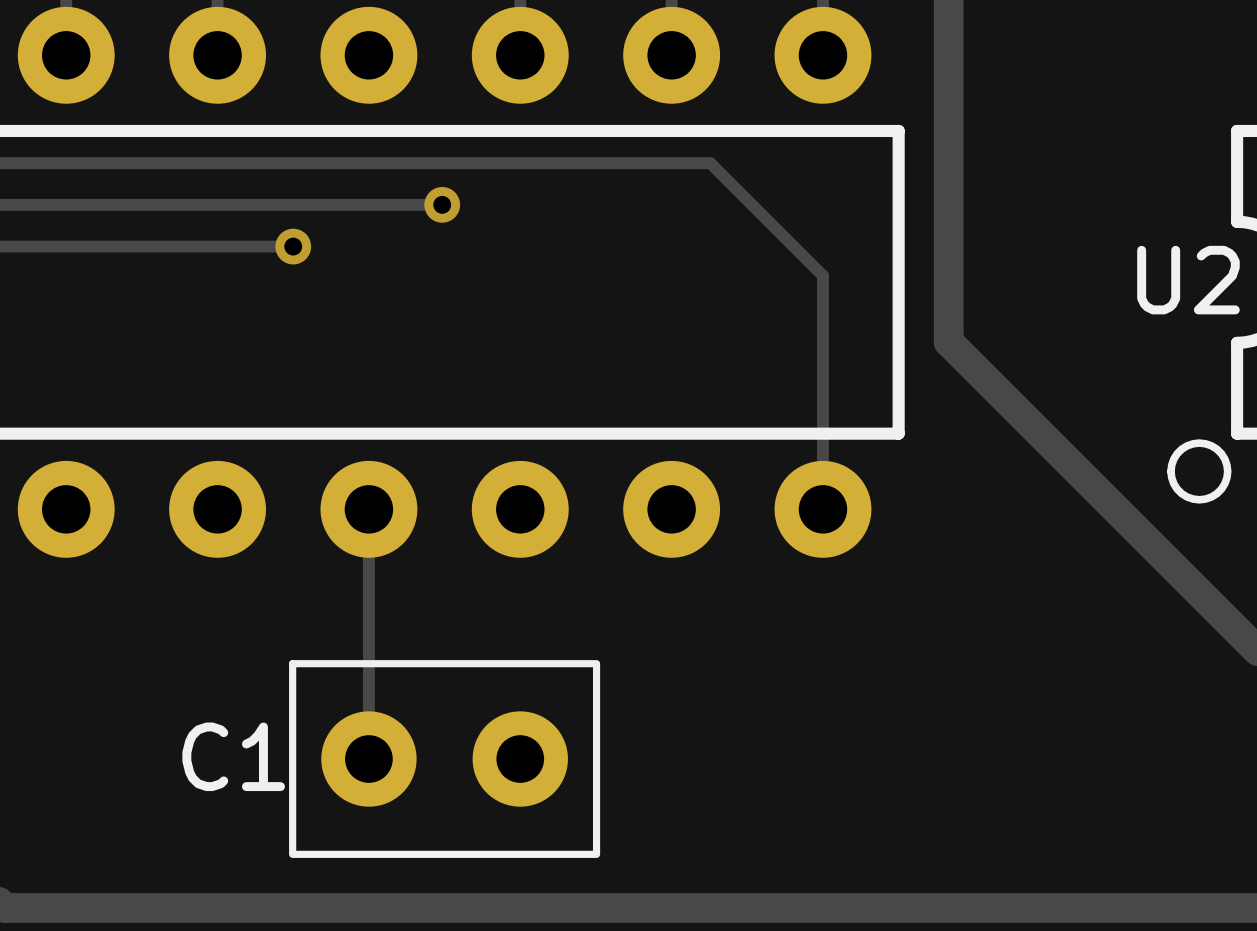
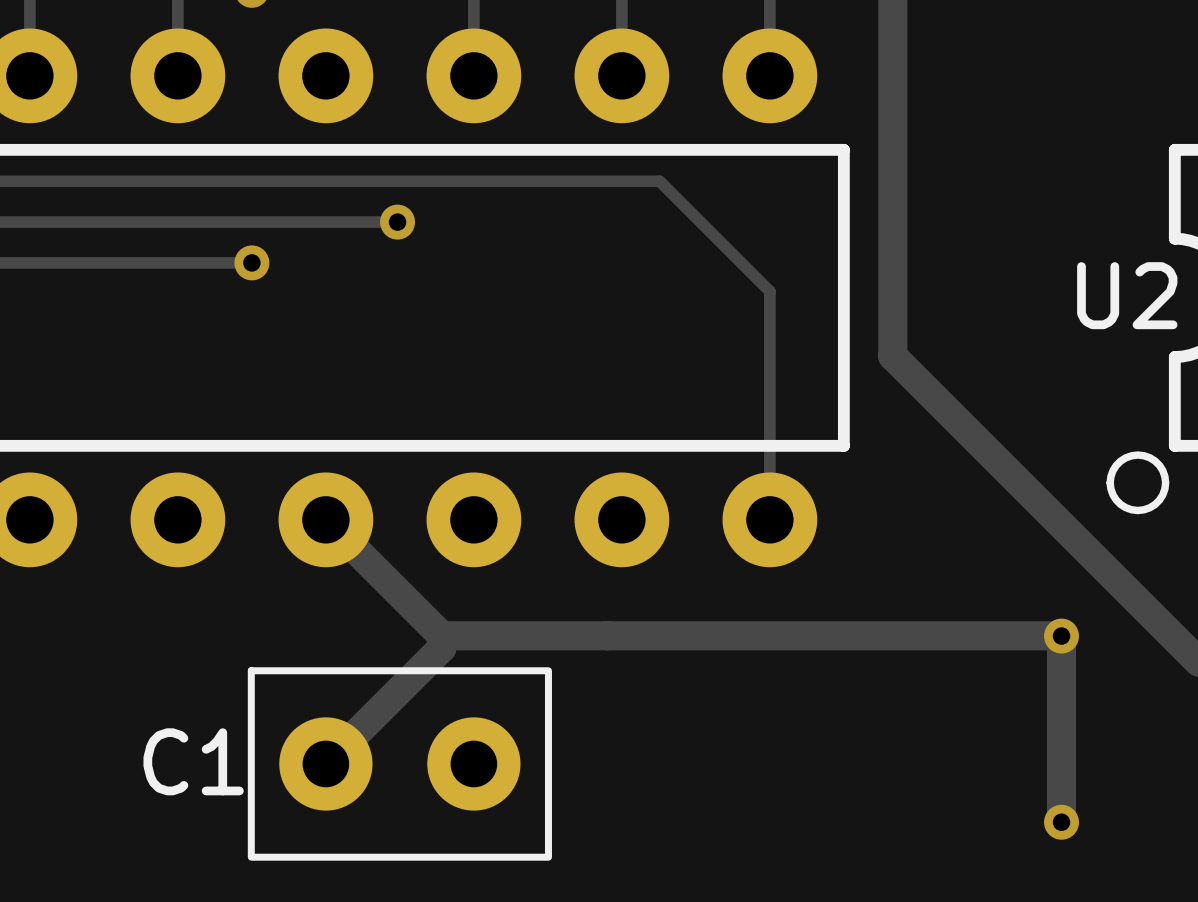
track: (368, 509) (368, 759) -> (441, 635) (441, 648) (325, 763)
track: none -> (325, 519) (441, 635)
track: none -> (441, 635) (1061, 635)
track: none -> (1061, 636) (1061, 822)
via: none -> (1061, 636)
via: none -> (1061, 822)

